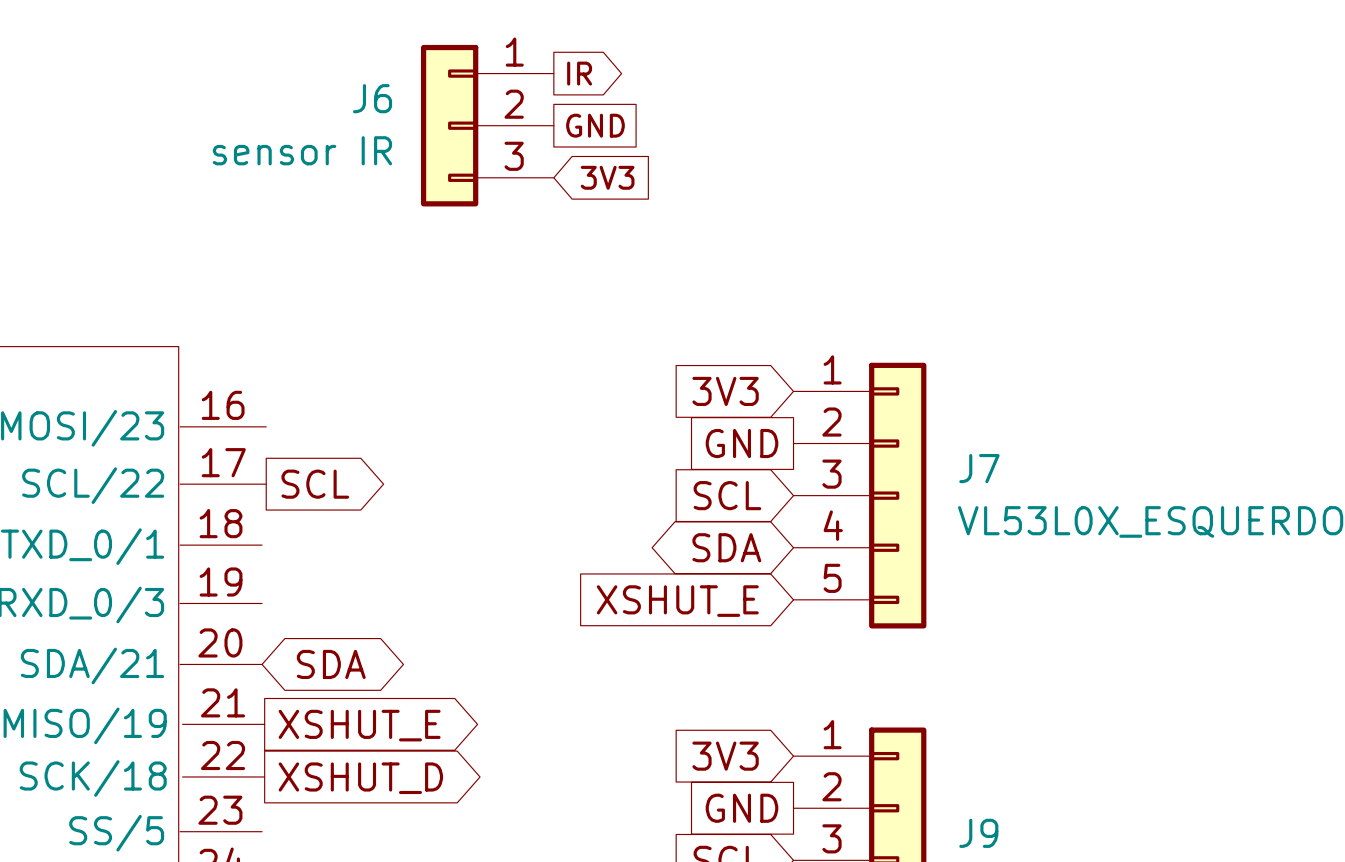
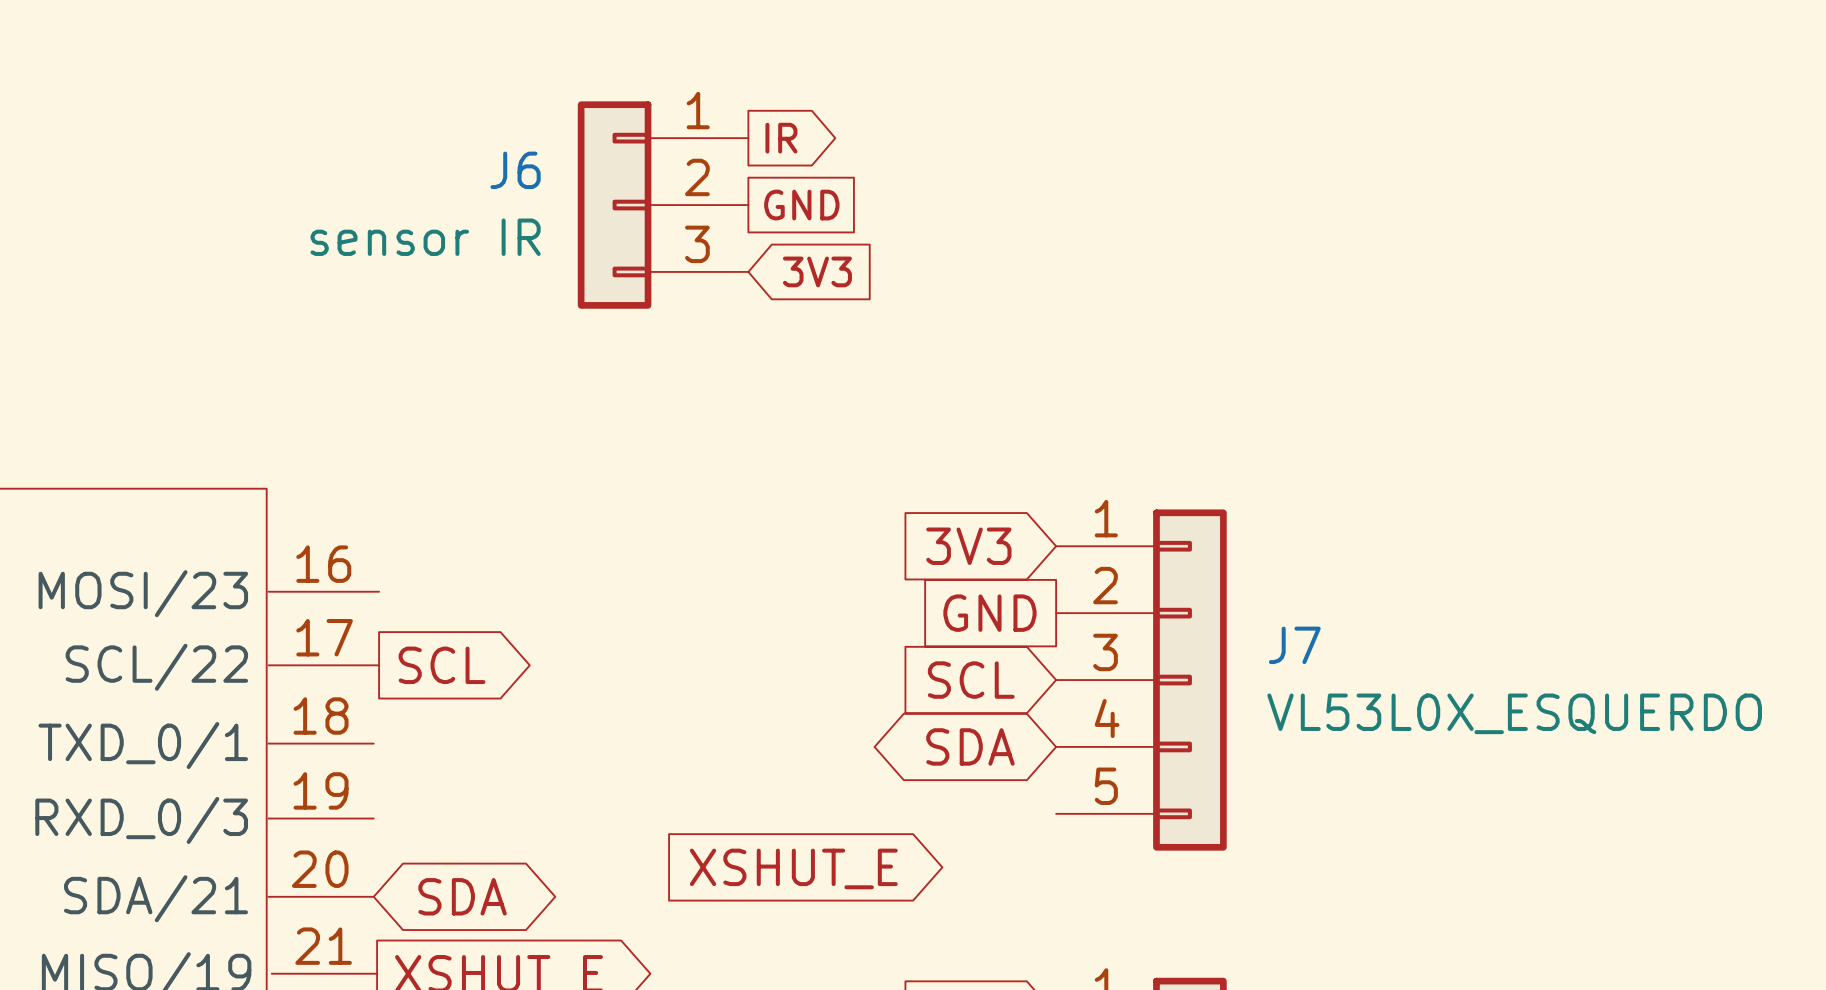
global label position: XSHUT_E (677, 601) -> XSHUT_E (793, 868)

